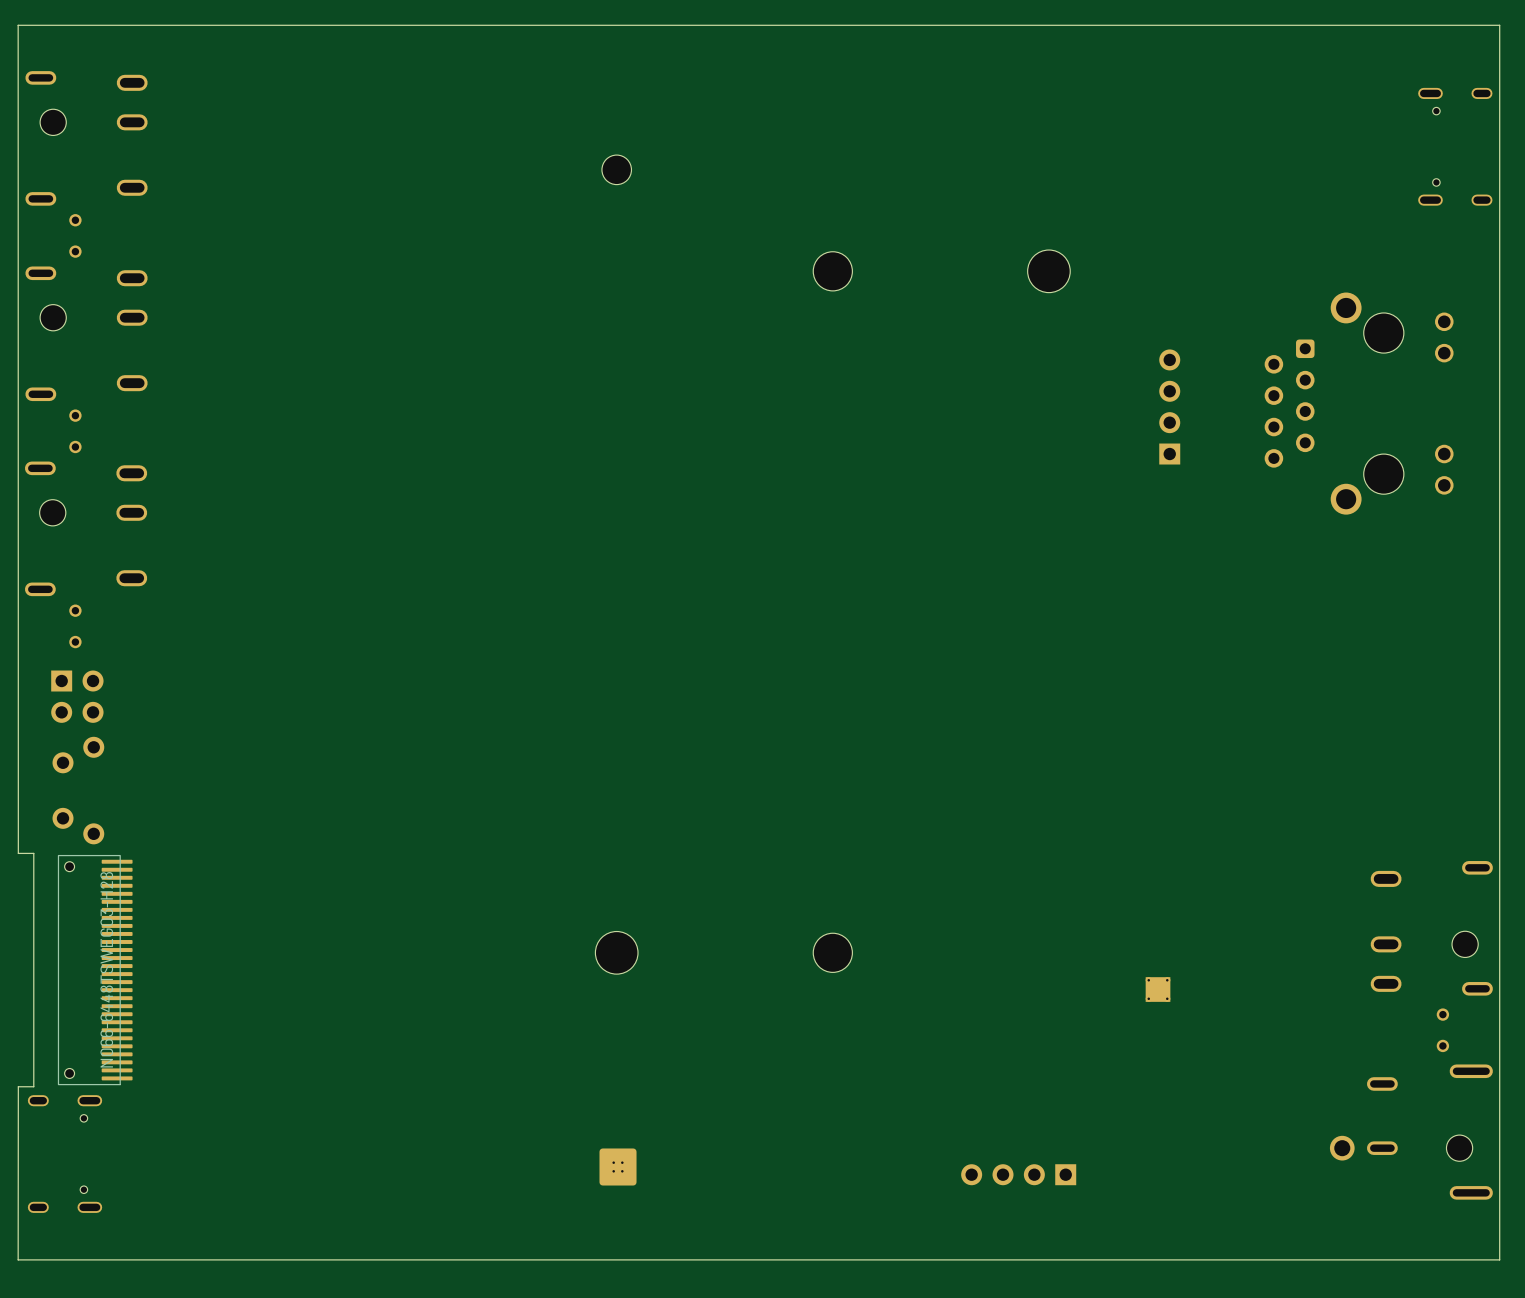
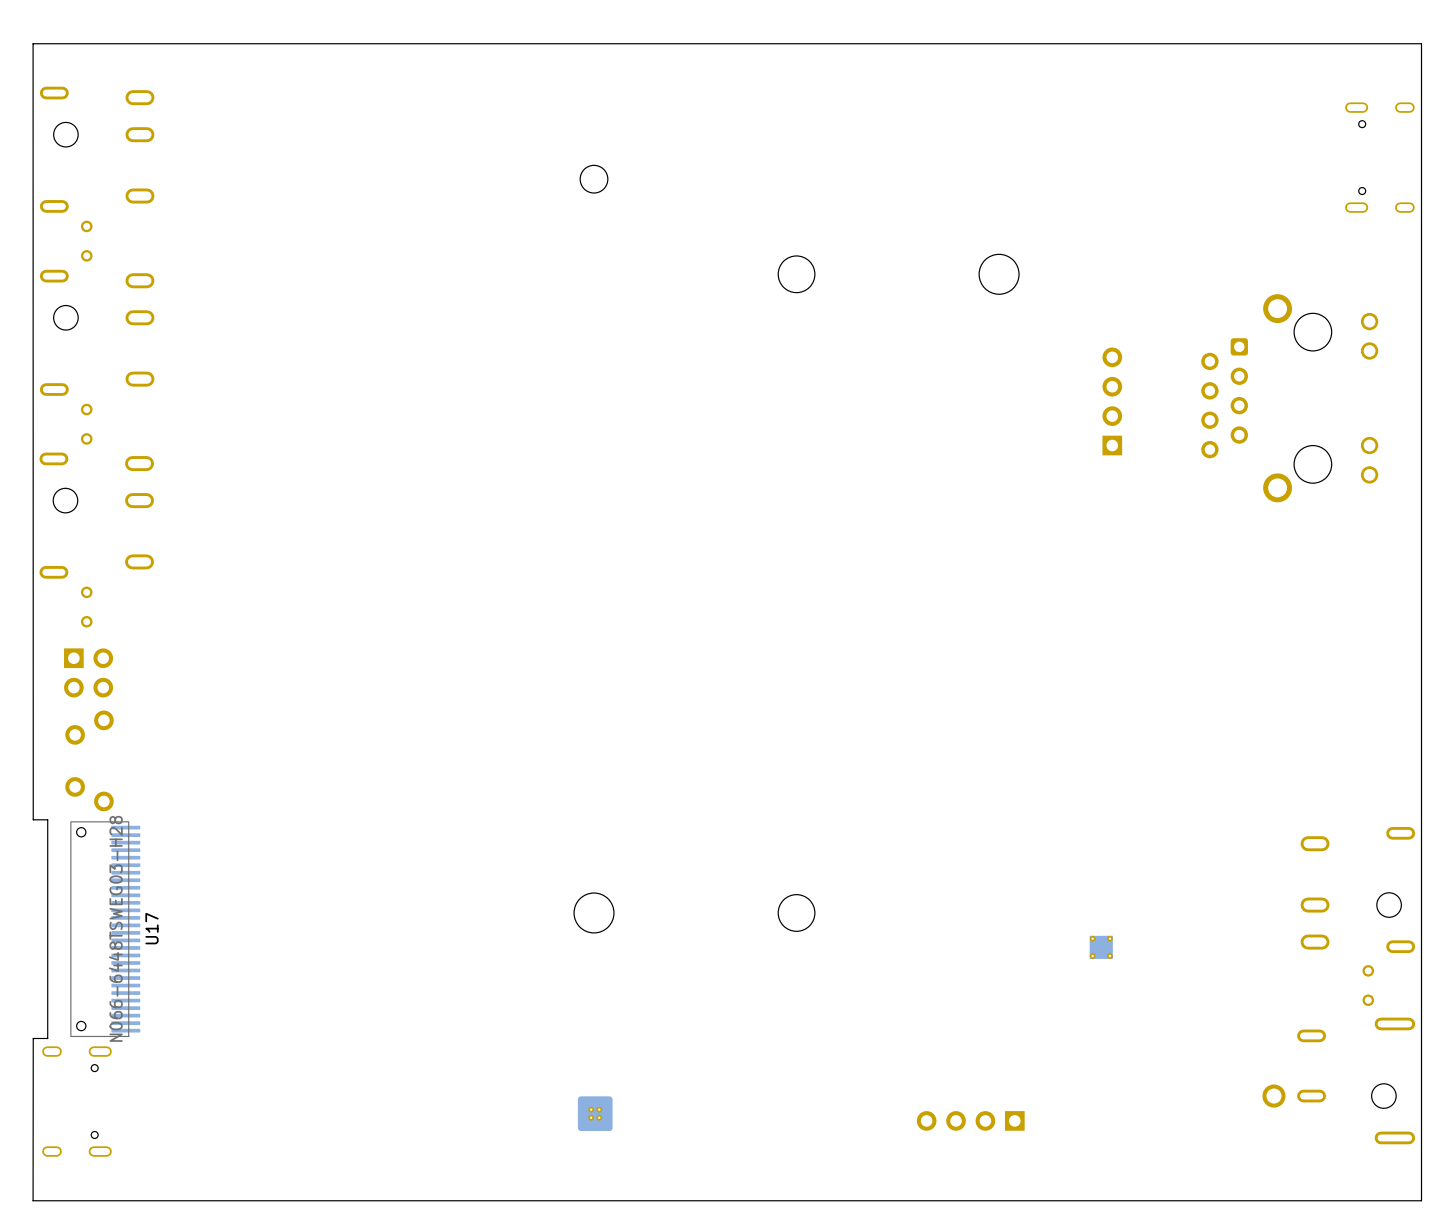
U17 name: none -> U17 (151, 928)

